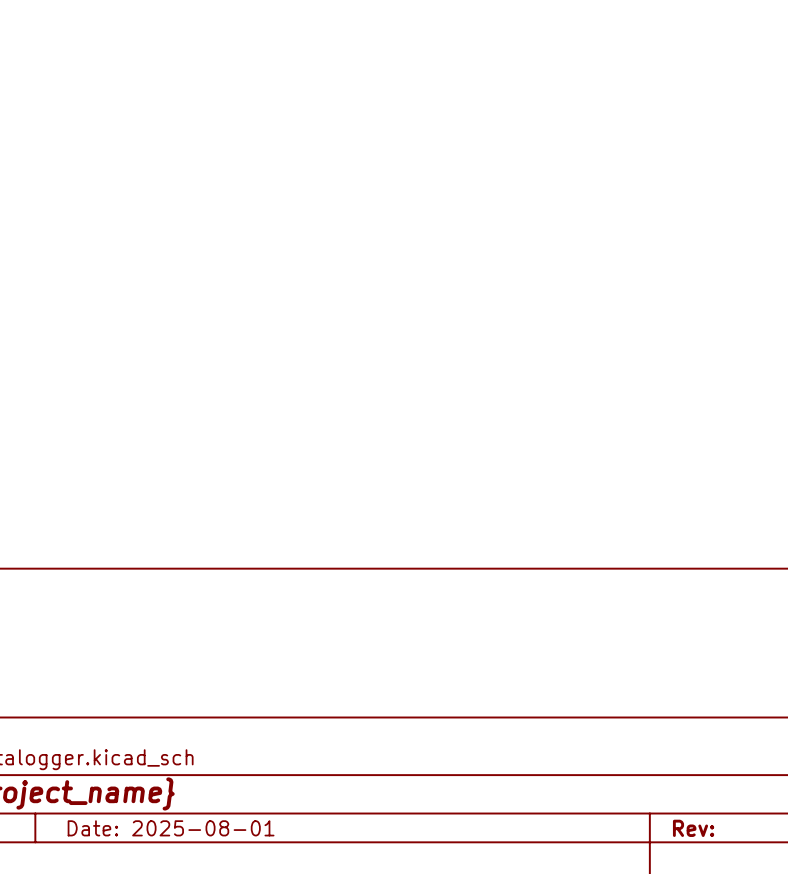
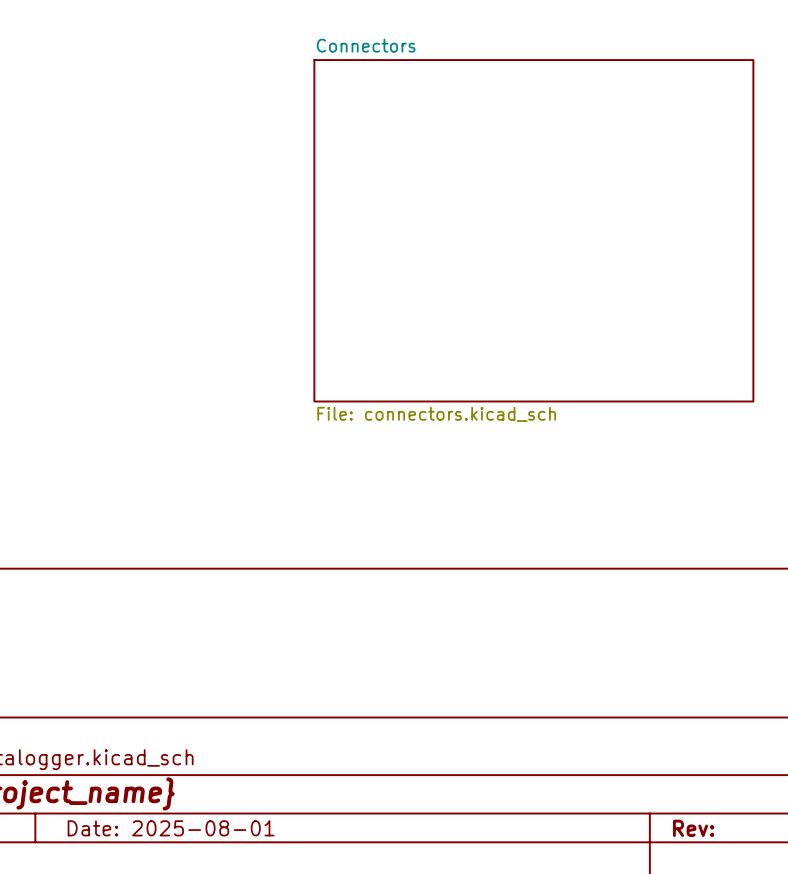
sheet Connectors: none -> File: connectors.kicad_sch (533, 230)

